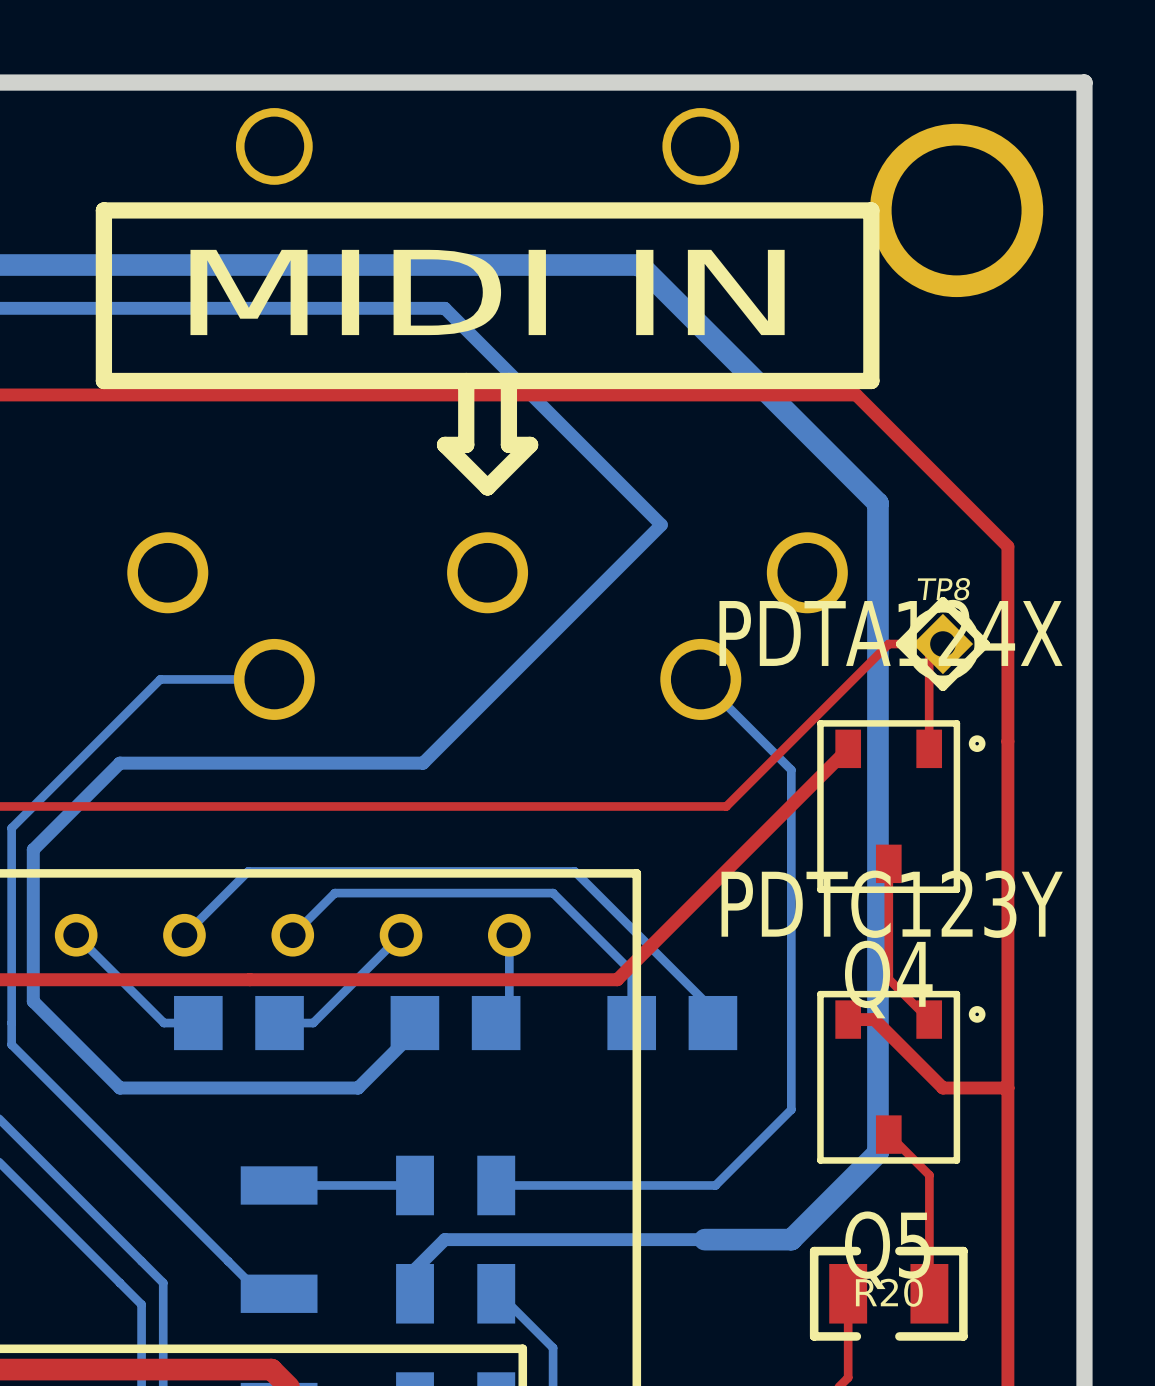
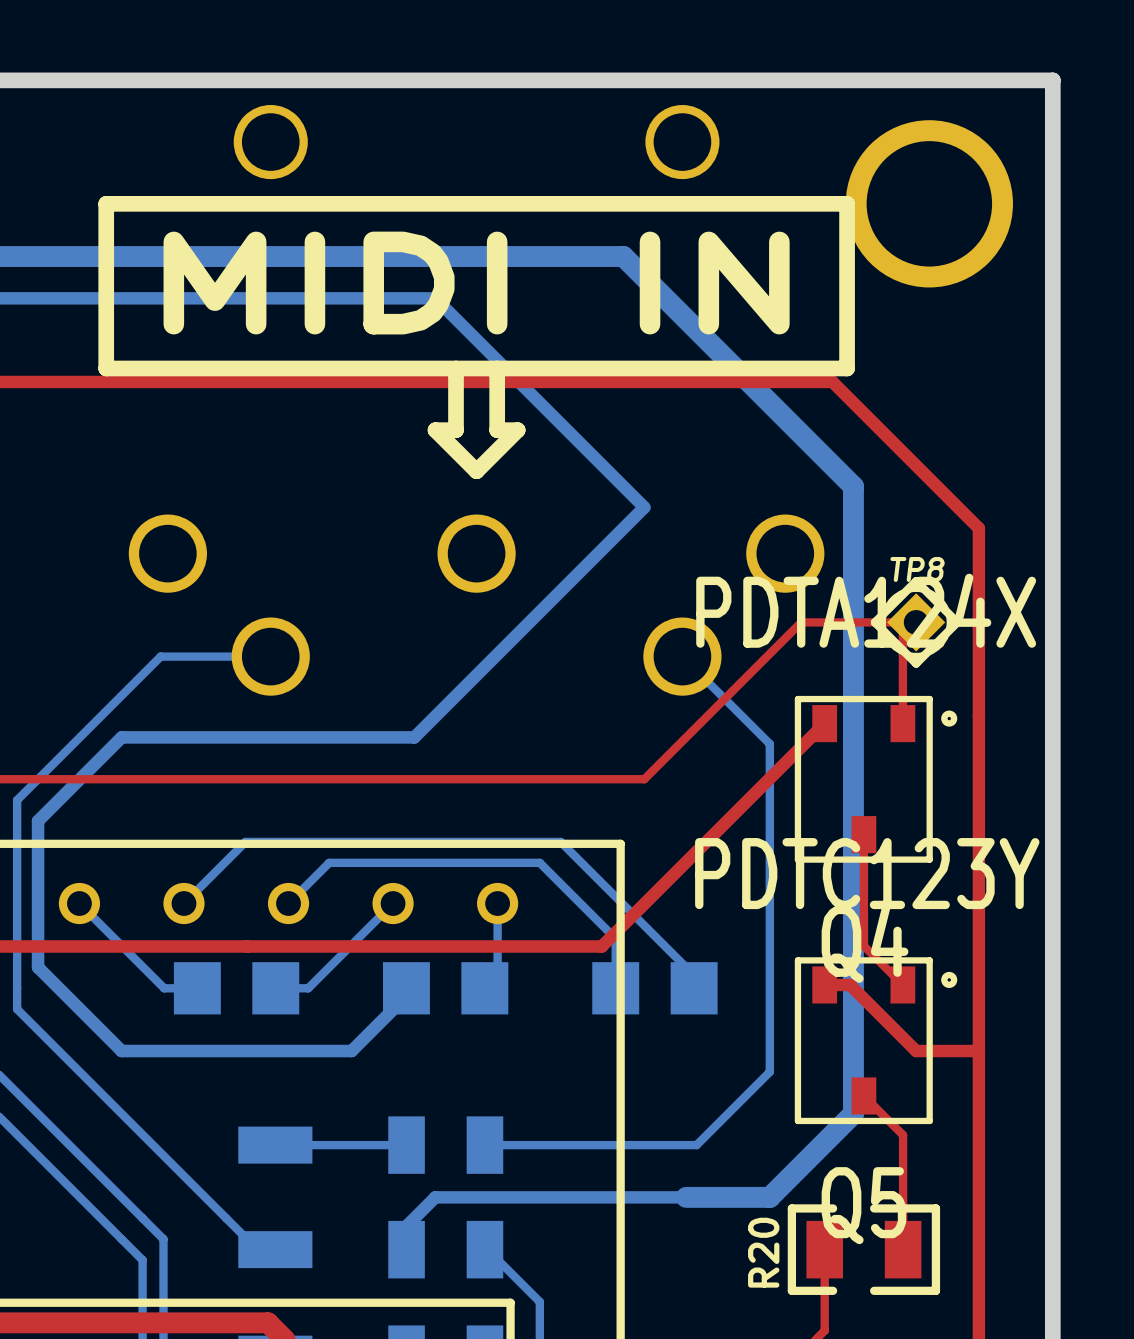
top track: (888, 644) (726, 806) (661, 806) -> (863, 622) (801, 622) (644, 779)
R20 name rotation: 0° (889, 1292) -> 90° counterclockwise (763, 1252)
R20 name position: R20 (889, 1292) -> R20 (763, 1252)

